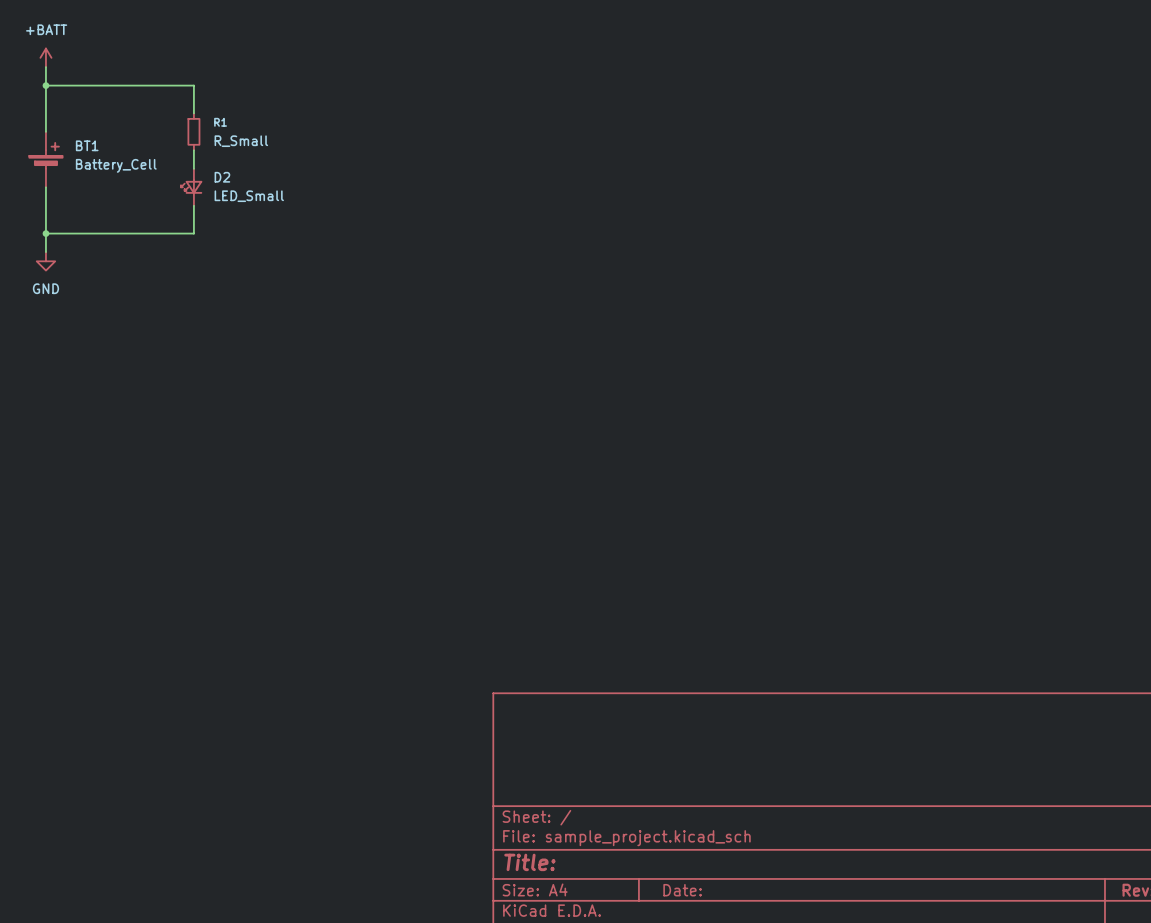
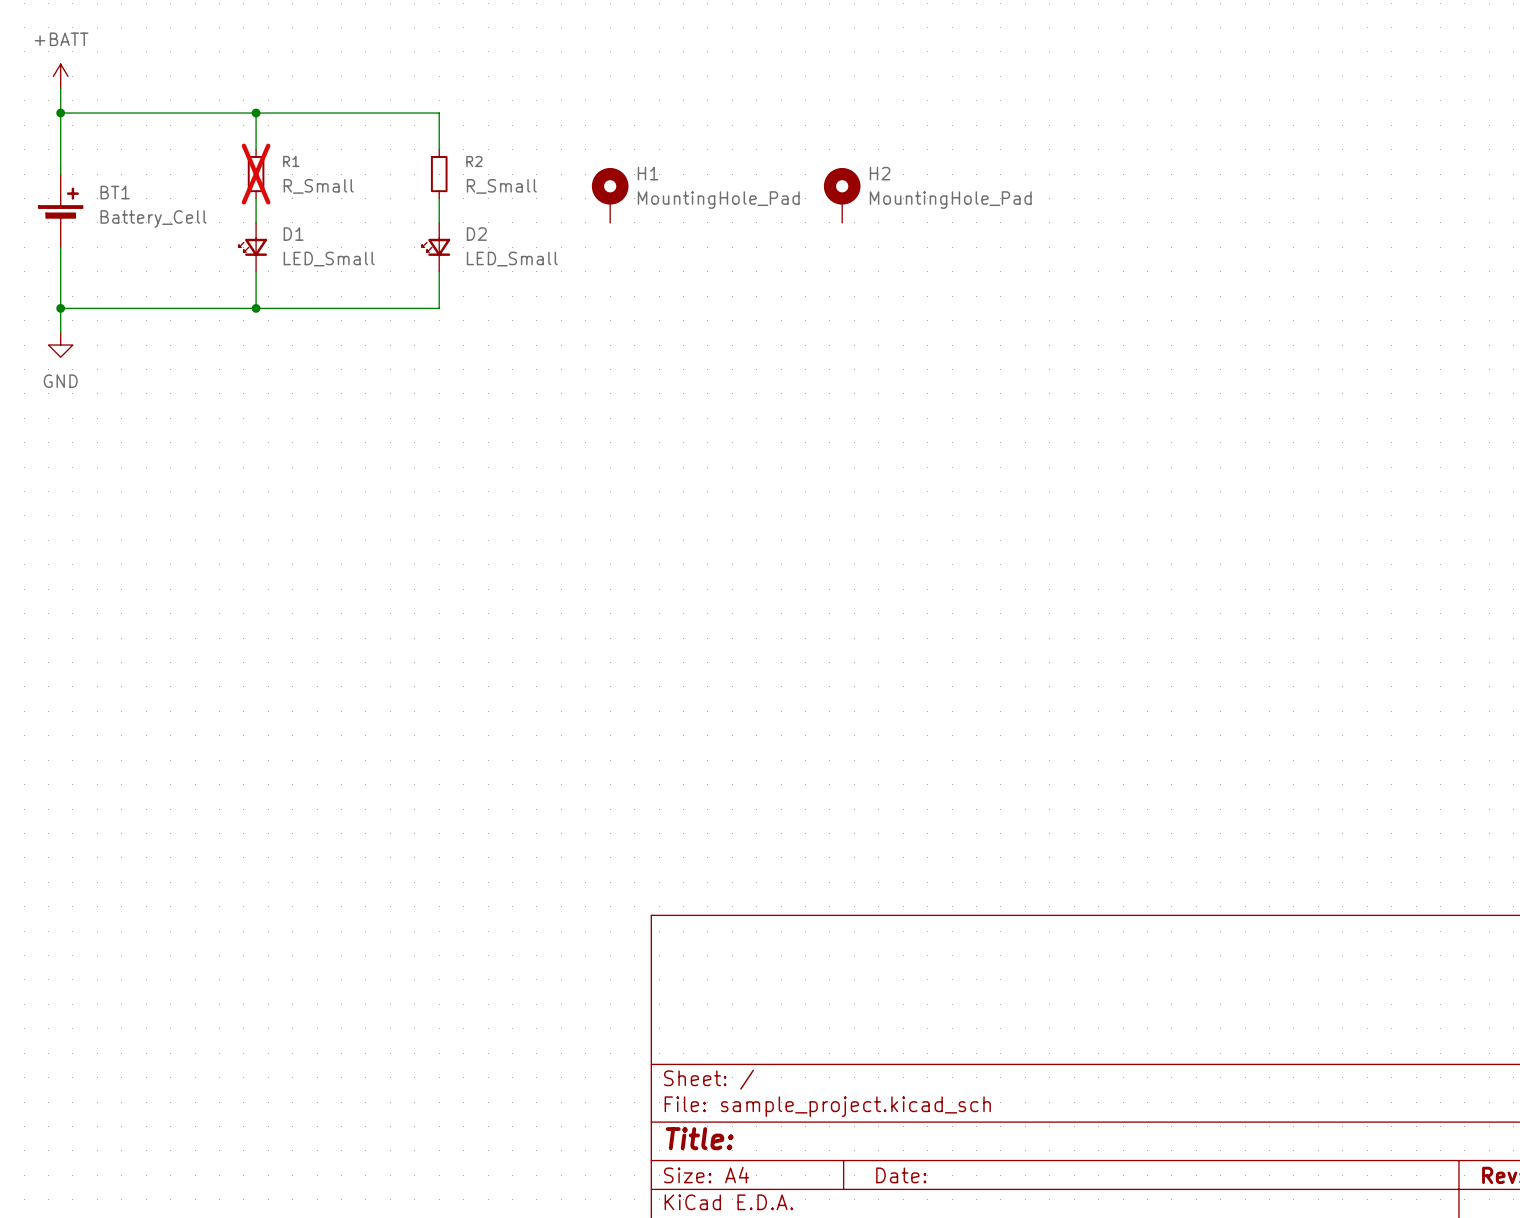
wire: none -> (256, 113) (439, 113) (439, 149)
junction: none -> (256, 113)
R1 do-not-place cross: none -> (256, 174)
R2: none -> R_Small (439, 174)
H1: none -> MountingHole_Pad (610, 195)
H2: none -> MountingHole_Pad (842, 195)
wire: none -> (439, 198) (439, 222)
D2 name: D2 (222, 177) -> D1 (293, 234)
D2: none -> LED_Small (436, 247)
wire: none -> (439, 271) (439, 308) (256, 308)
junction: none -> (256, 308)

